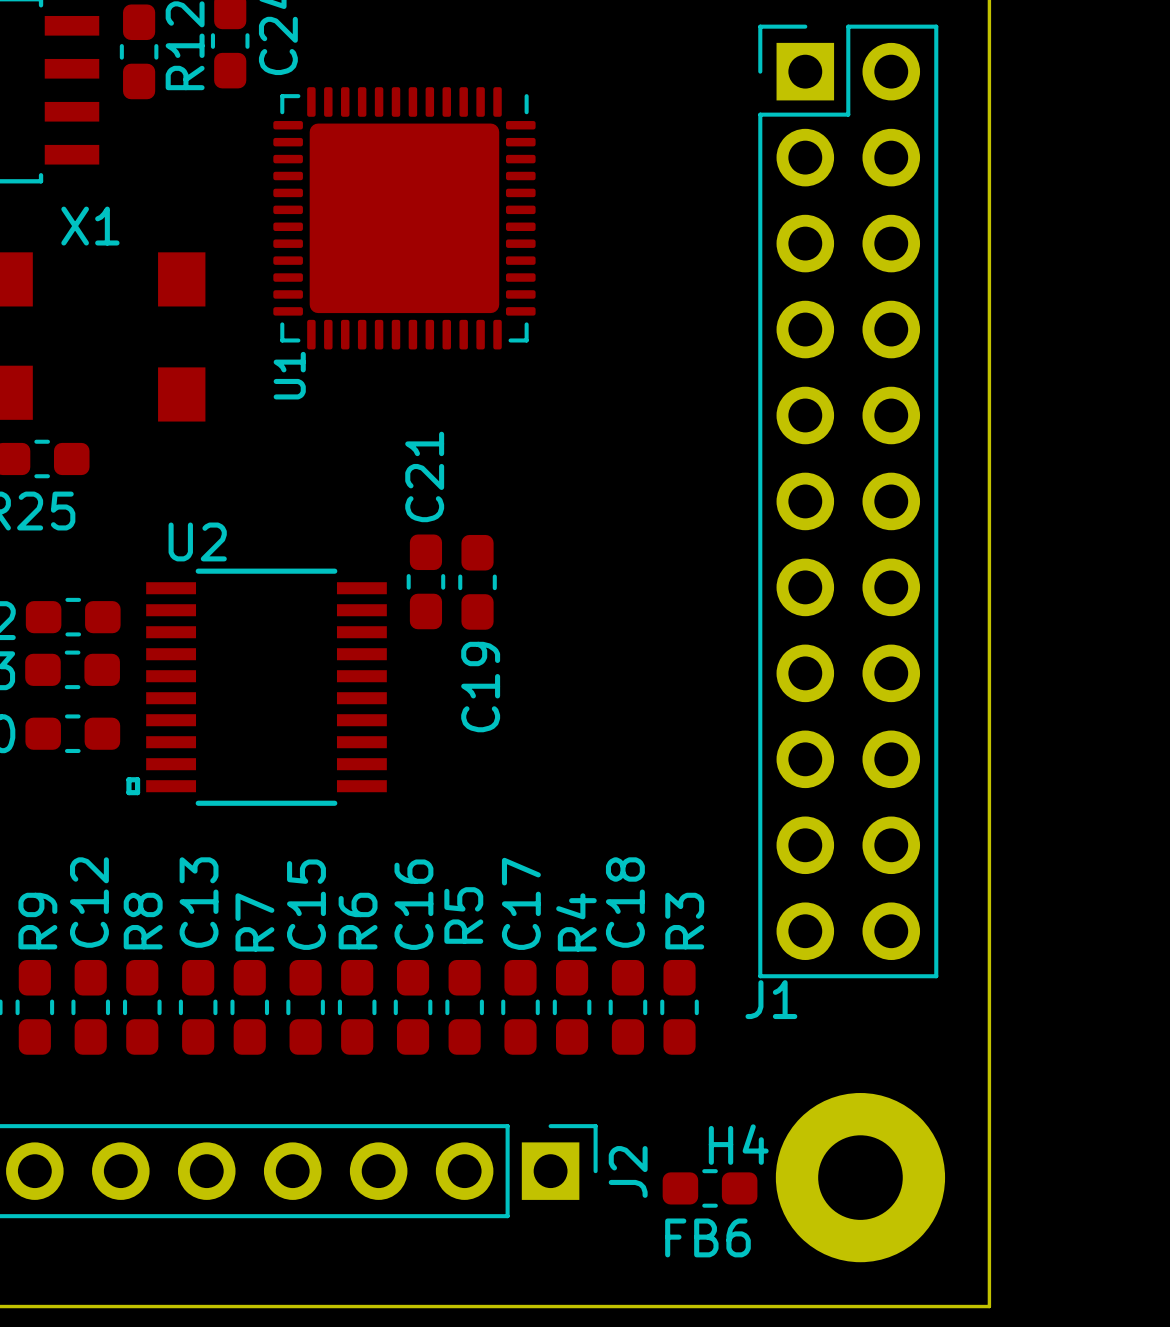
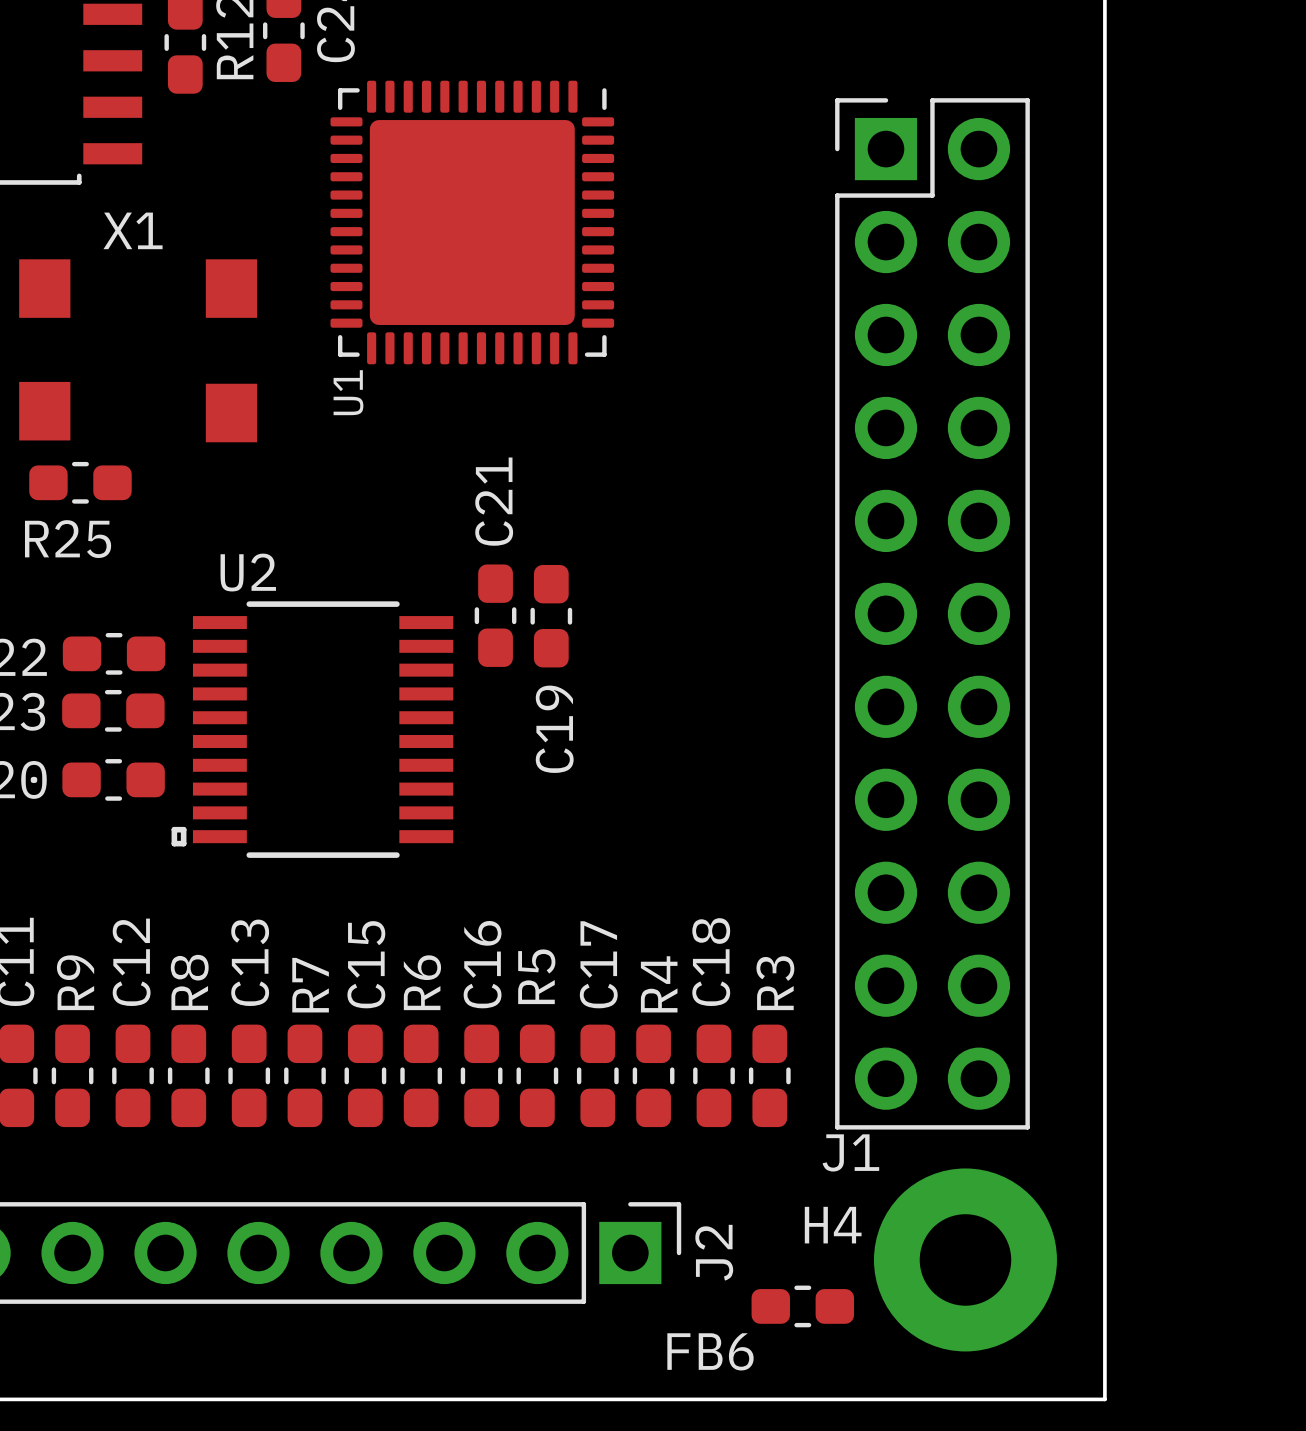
J1 position: (848, 501) -> (932, 613)
FB6 position: (710, 1188) -> (802, 1306)
FB6 name position: FB6 (707, 1237) -> FB6 (710, 1351)

